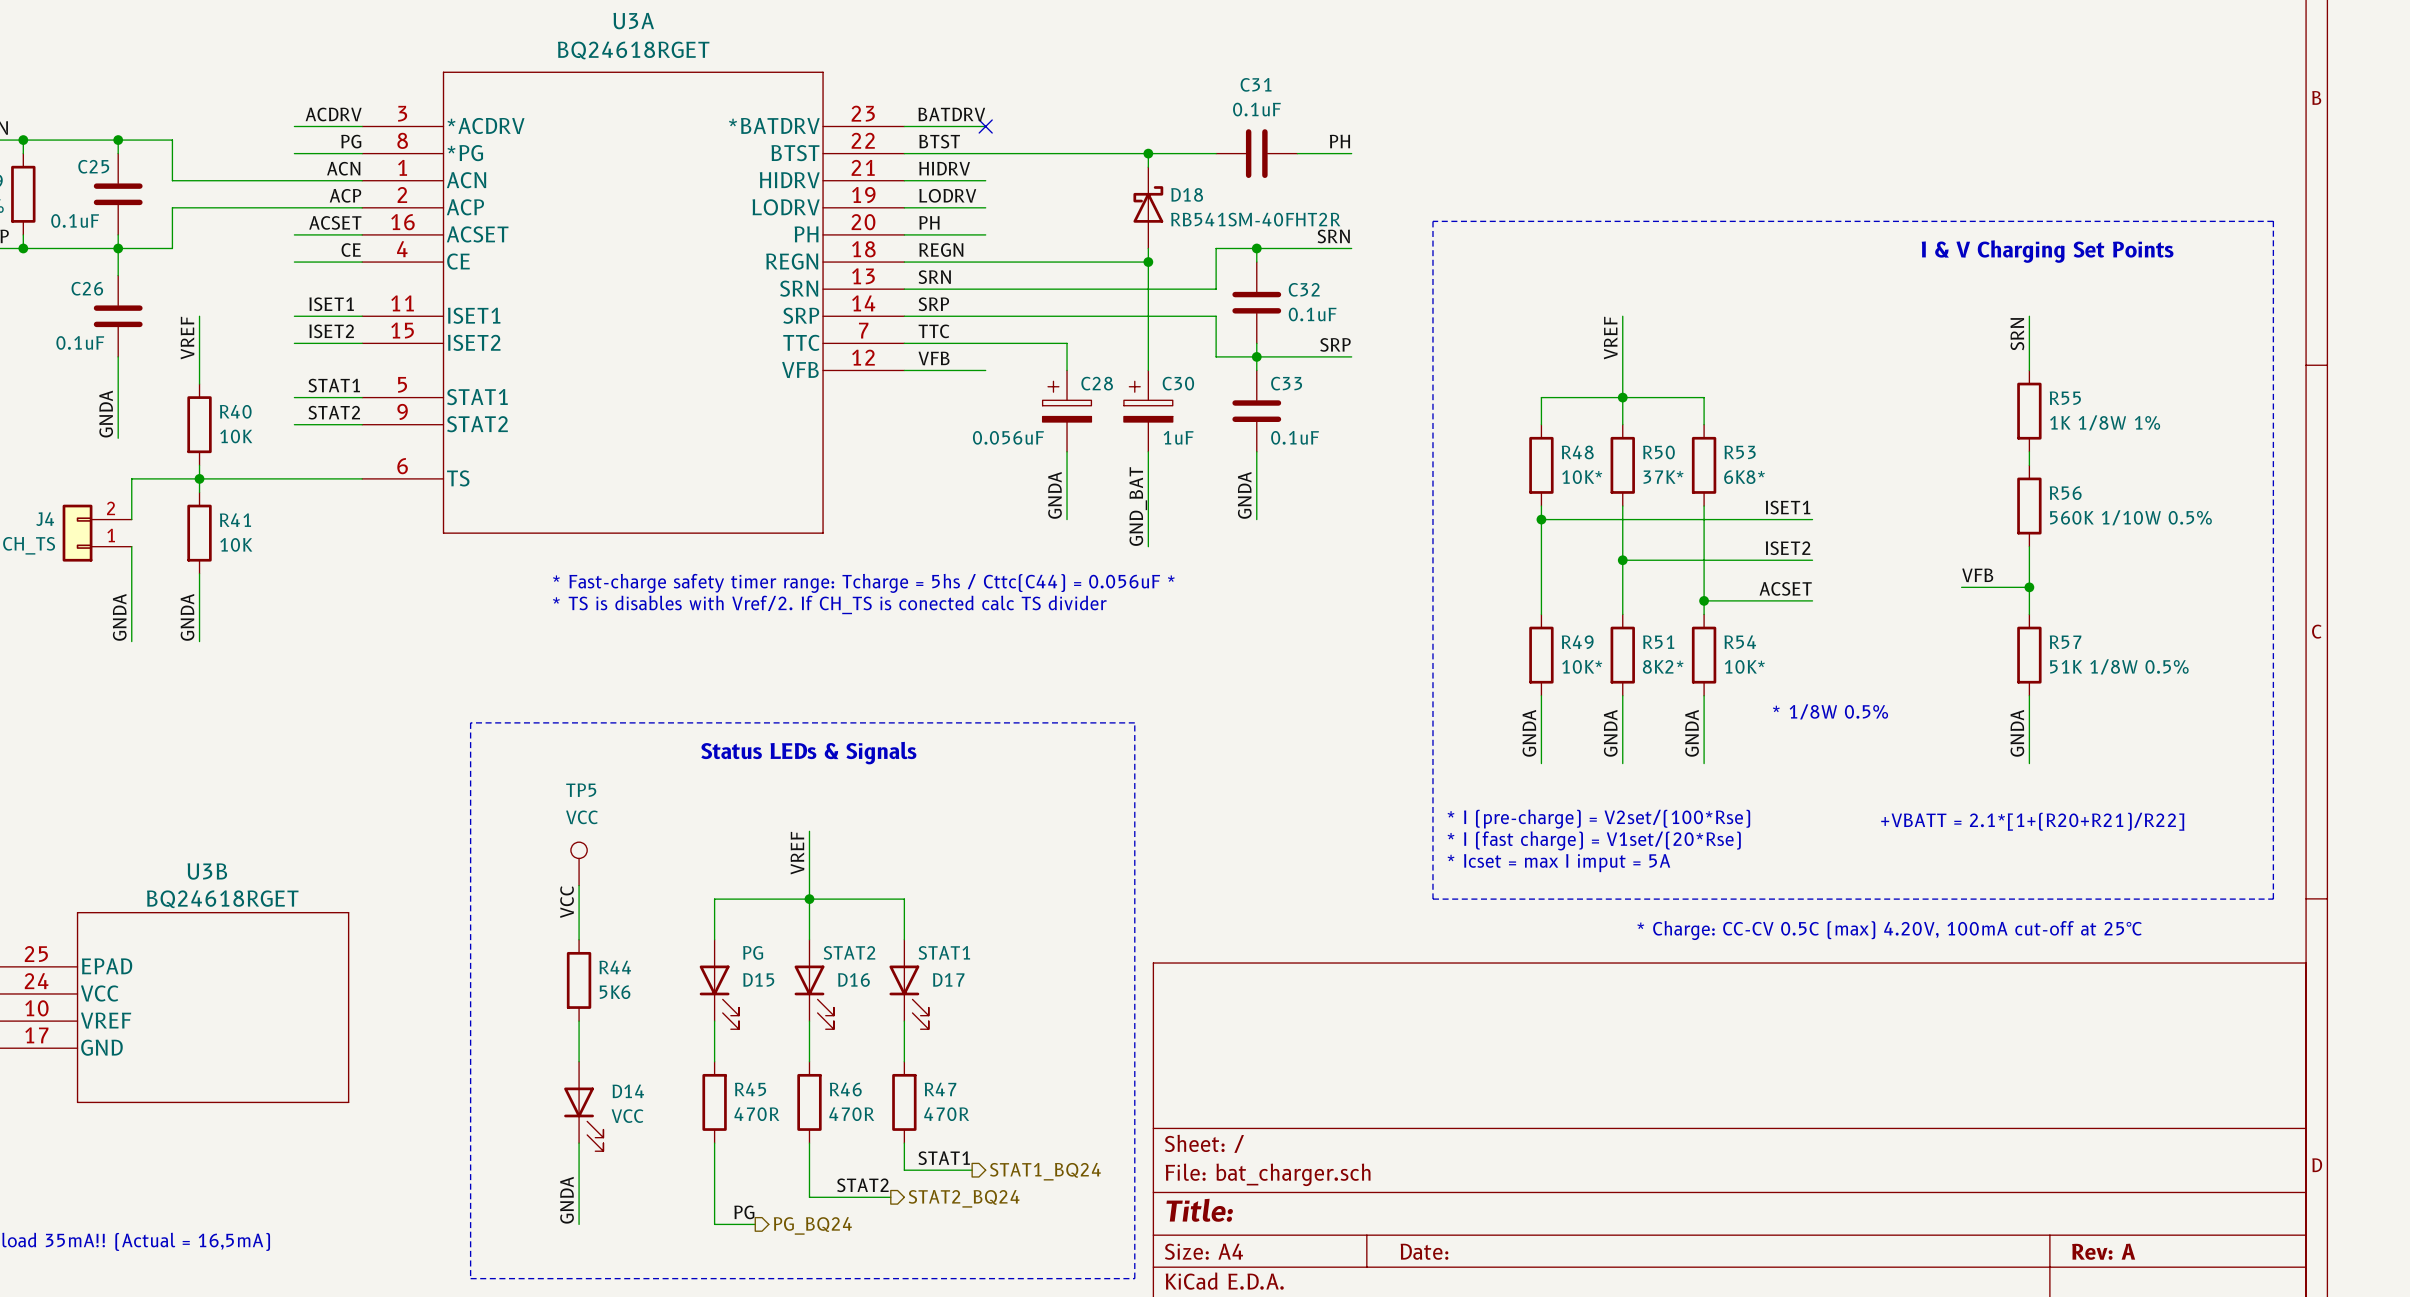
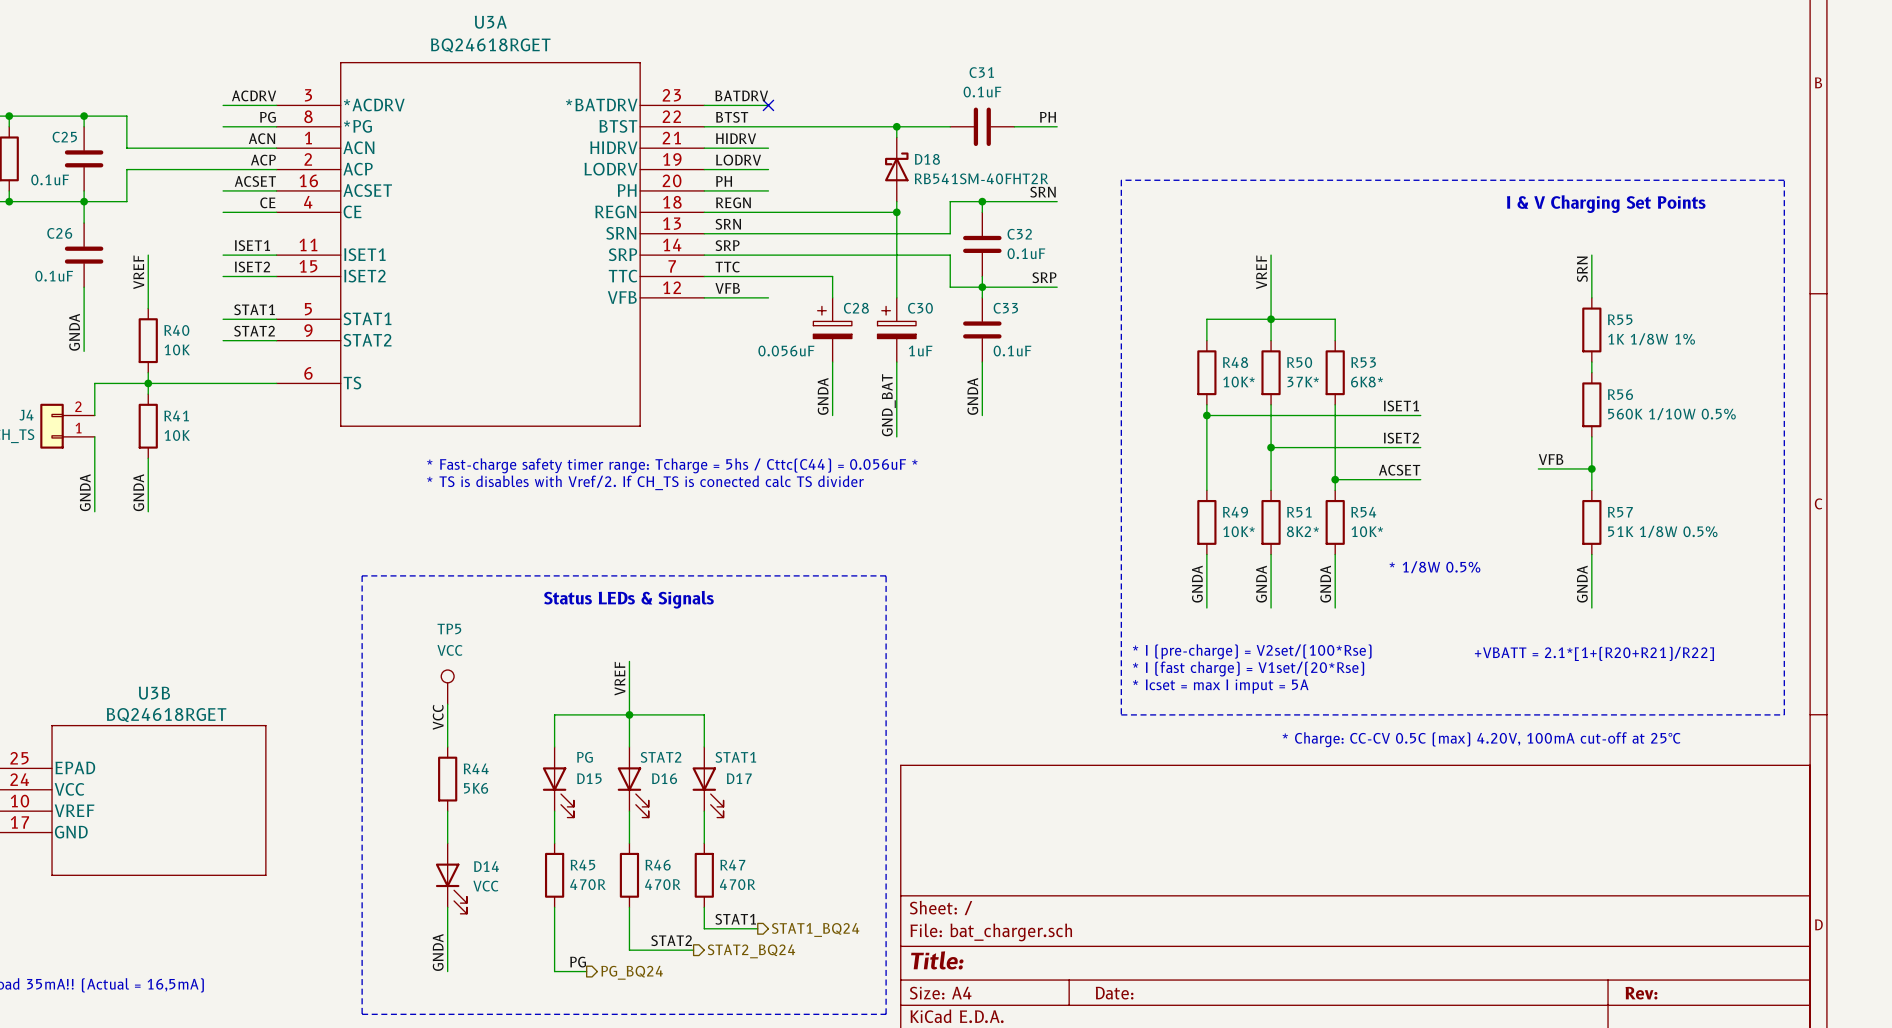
title block: Rev: A (2103, 1251) -> Rev: (1641, 993)

